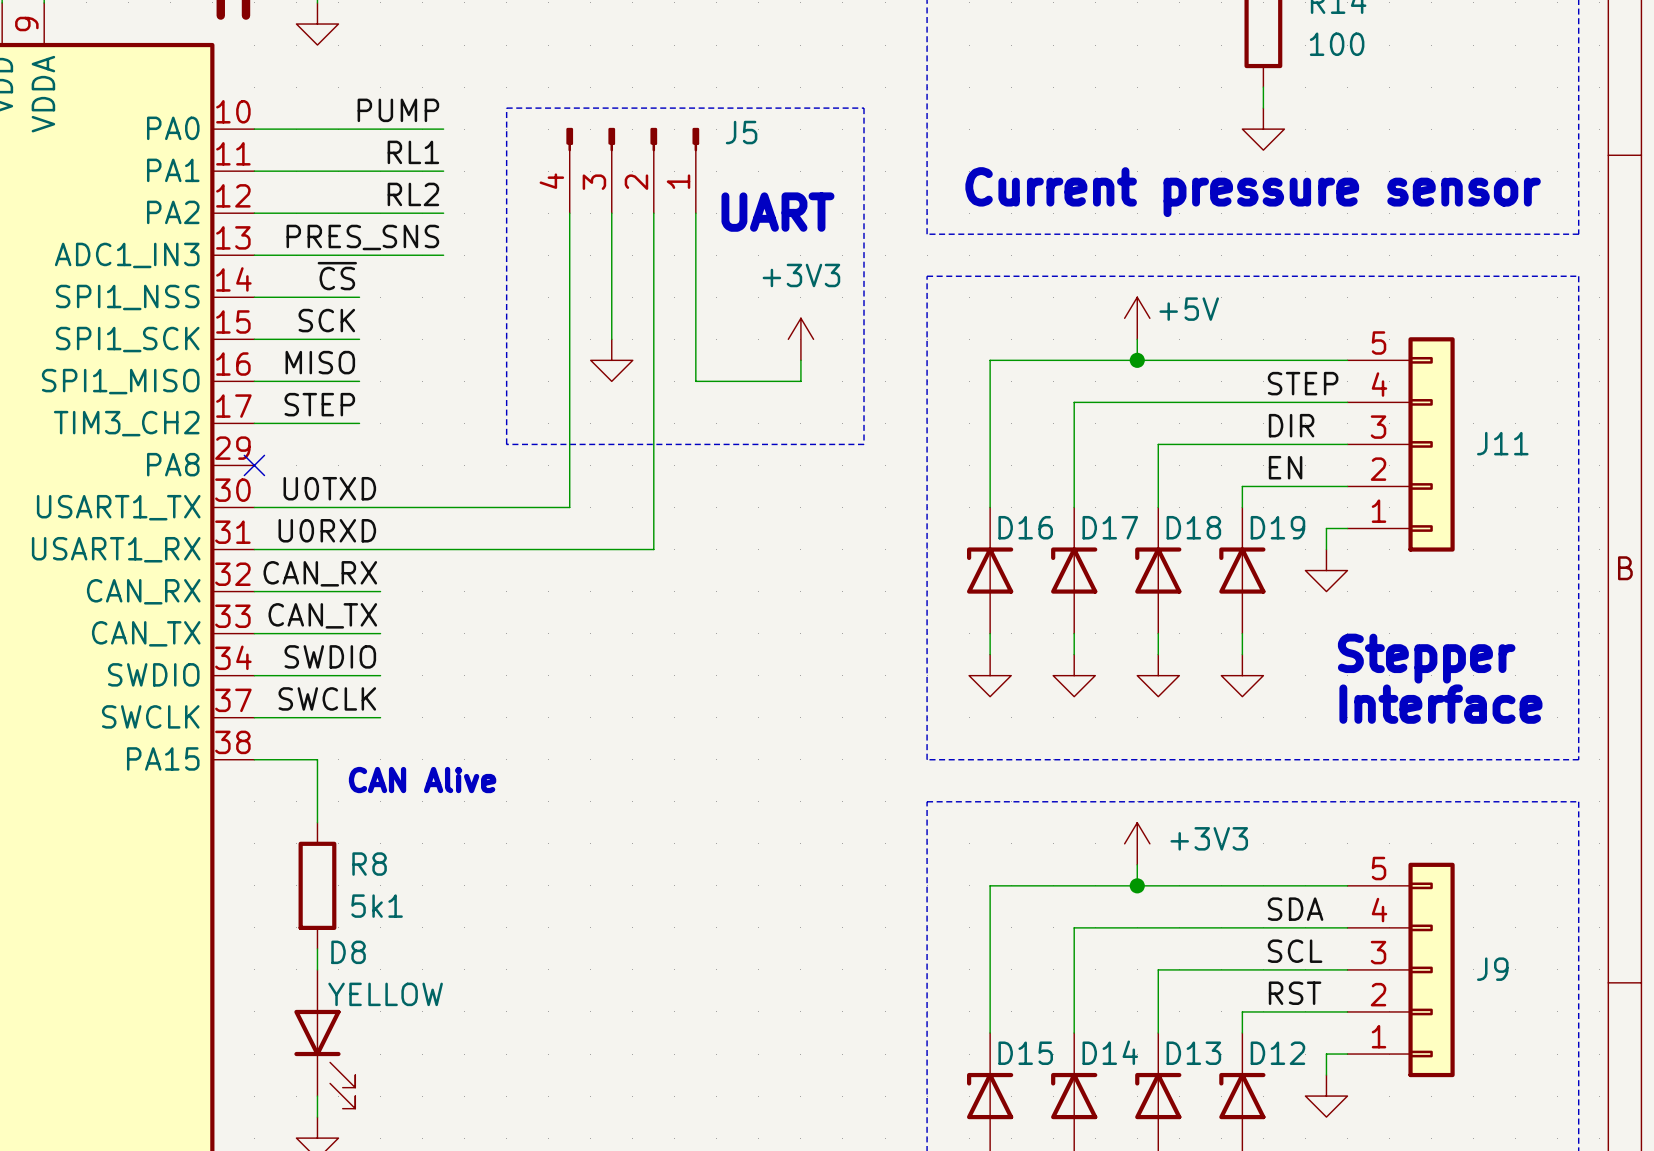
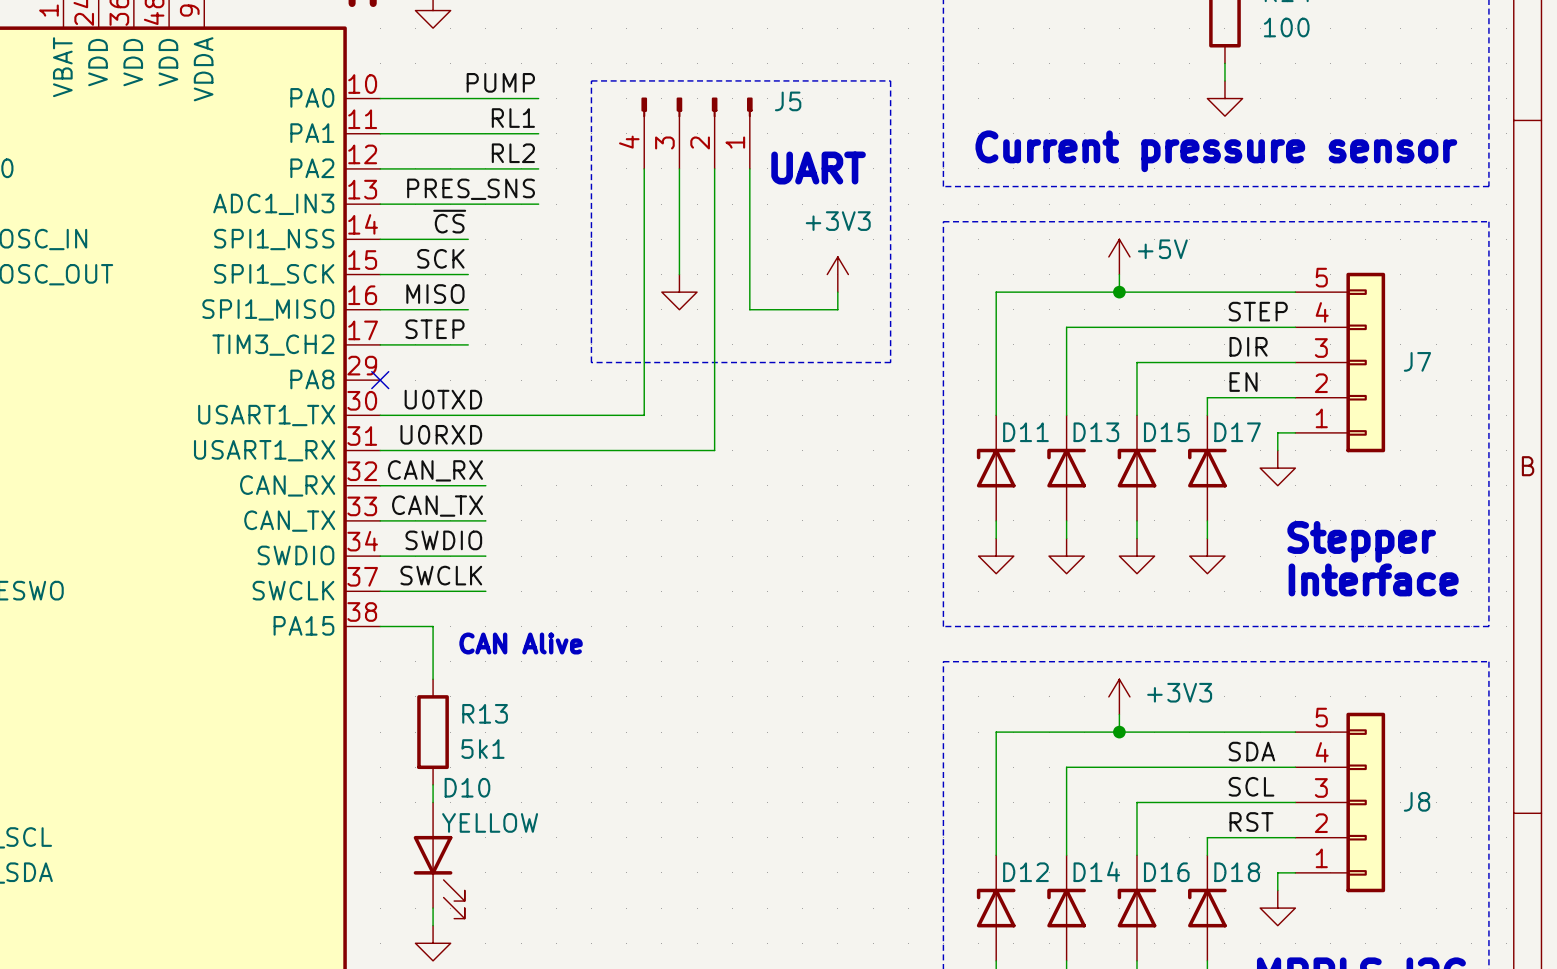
J11 name: J11 (1502, 443) -> J7 (1417, 361)
D16 name: D16 (1025, 527) -> D11 (1025, 432)
D17 name: D17 (1110, 527) -> D13 (1096, 432)
D18 name: D18 (1193, 527) -> D15 (1166, 432)
D19 name: D19 (1277, 527) -> D17 (1237, 432)
R8 name: R8 (369, 864) -> R13 (485, 713)
D8 name: D8 (348, 952) -> D10 (467, 787)
J9 name: J9 (1492, 969) -> J8 (1417, 801)
D15 name: D15 (1025, 1053) -> D12 (1025, 872)
D13 name: D13 (1193, 1053) -> D16 (1166, 872)
D12 name: D12 (1277, 1053) -> D18 (1237, 872)

